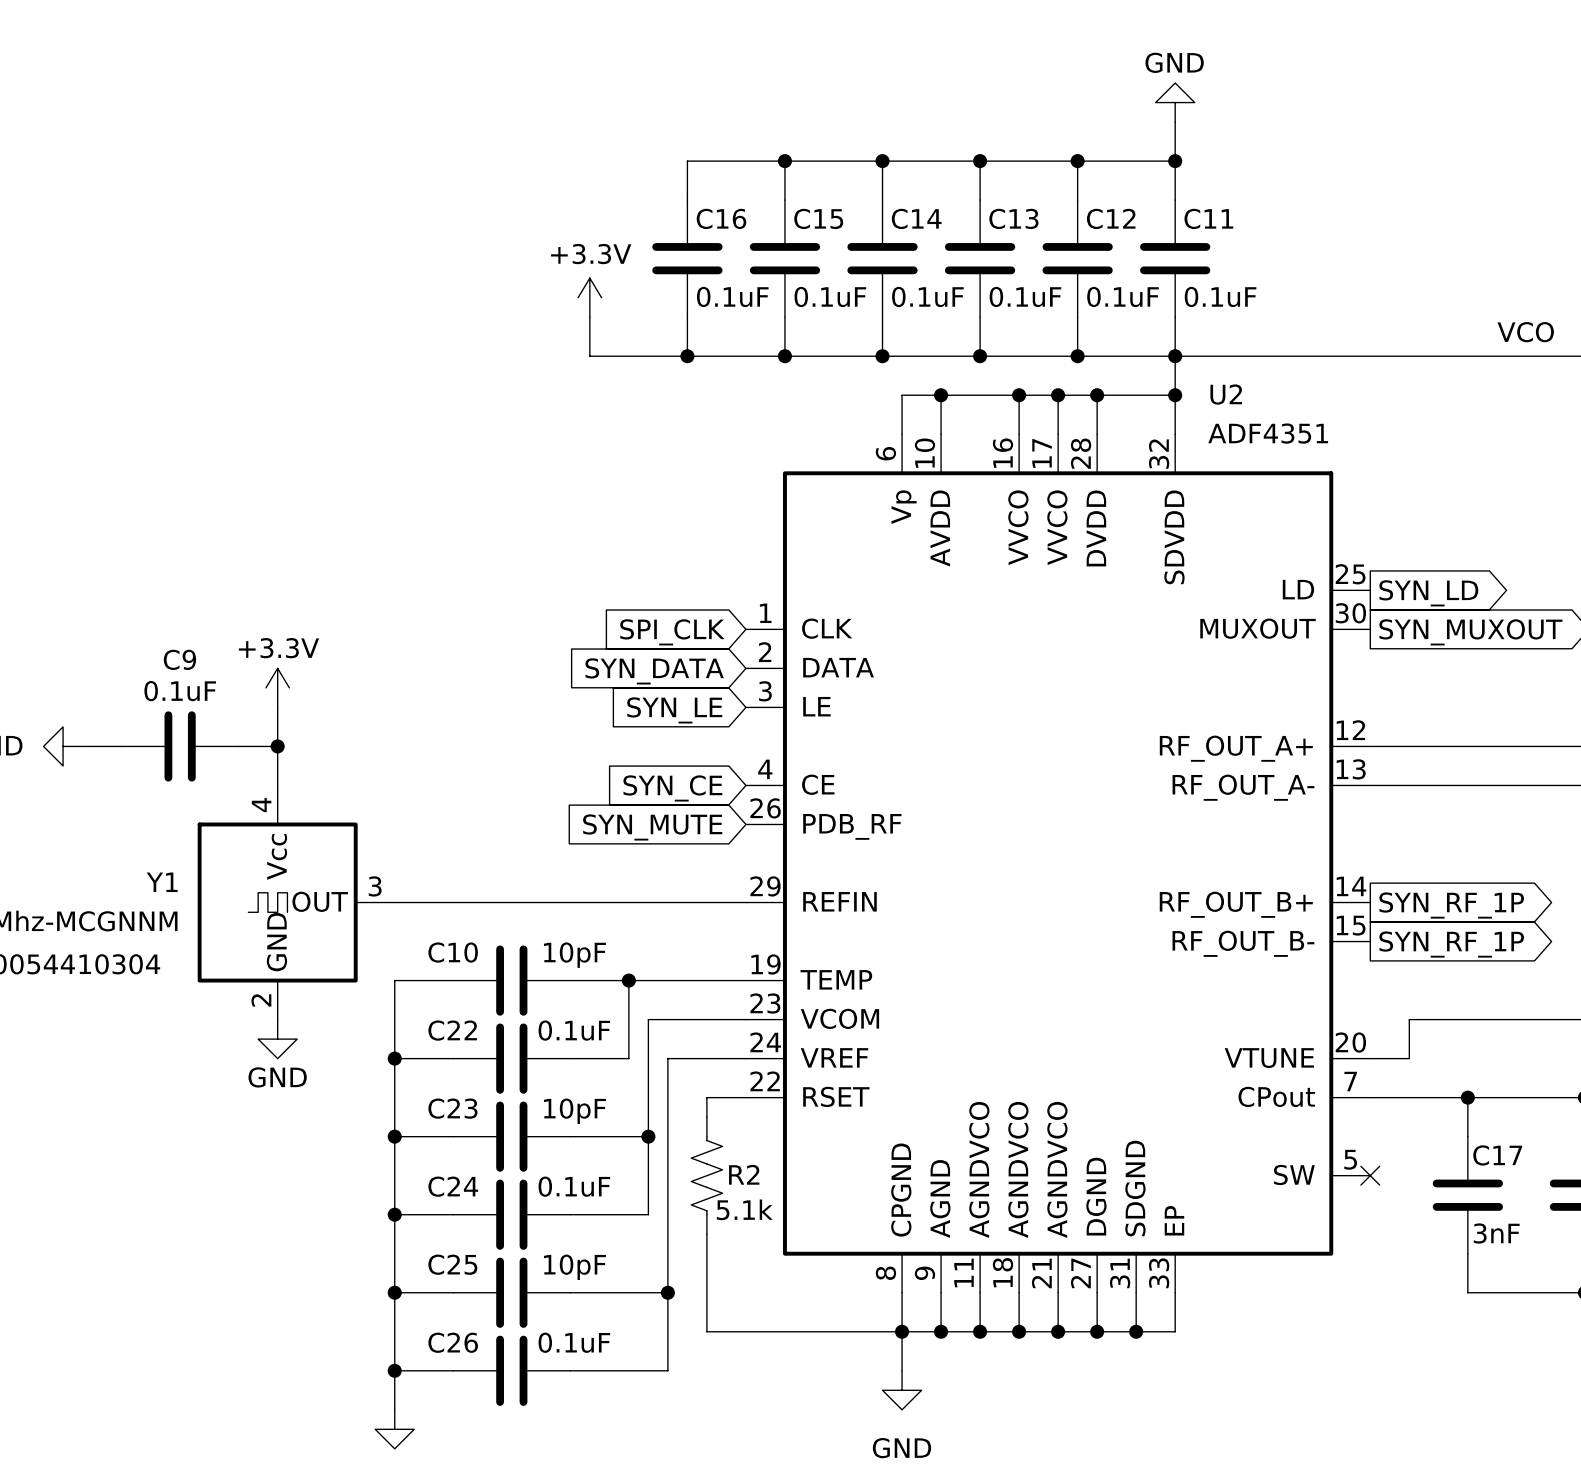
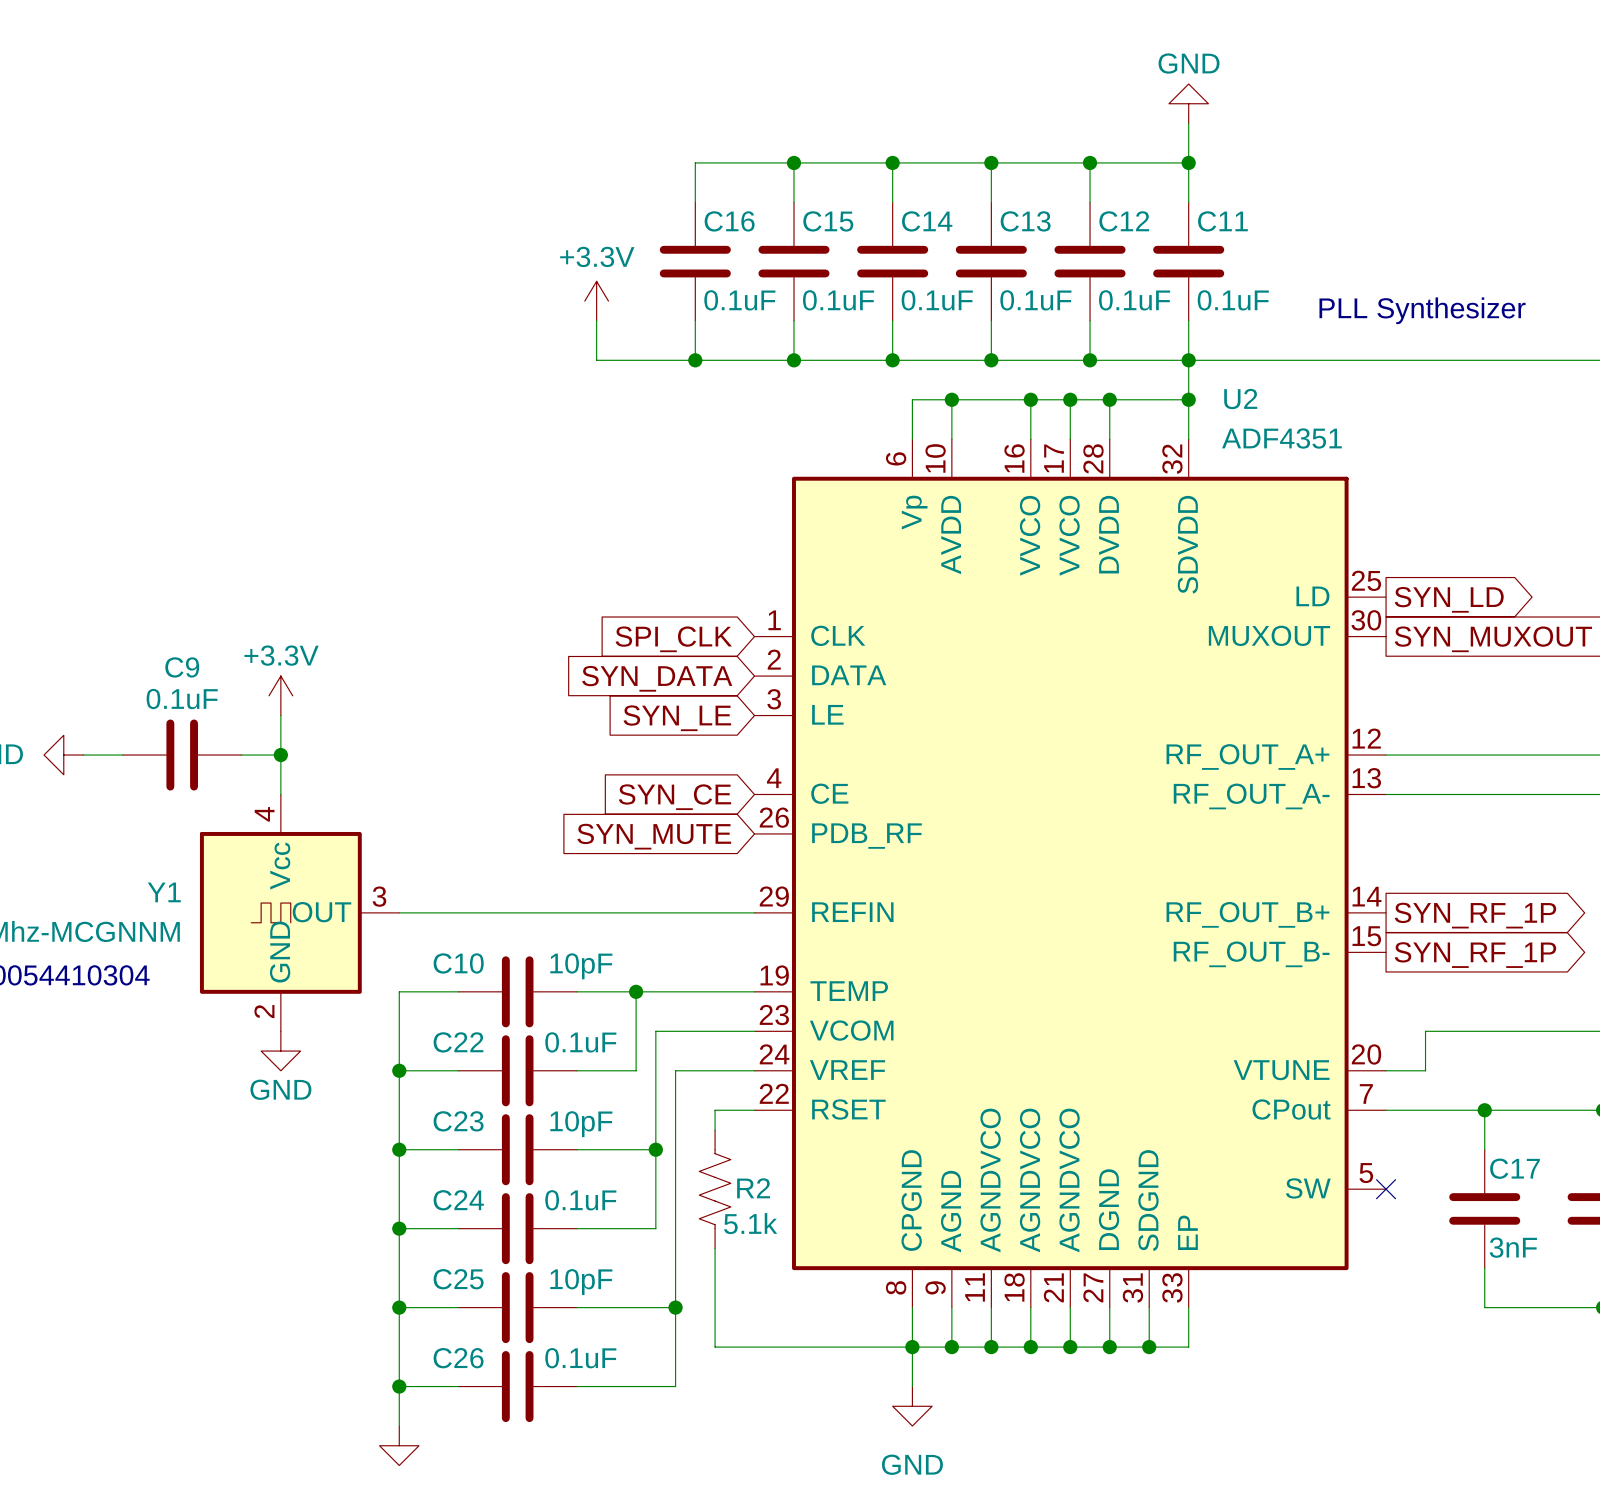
text: none -> PLL Synthesizer (1422, 310)
text: VCO (1525, 332) -> none

